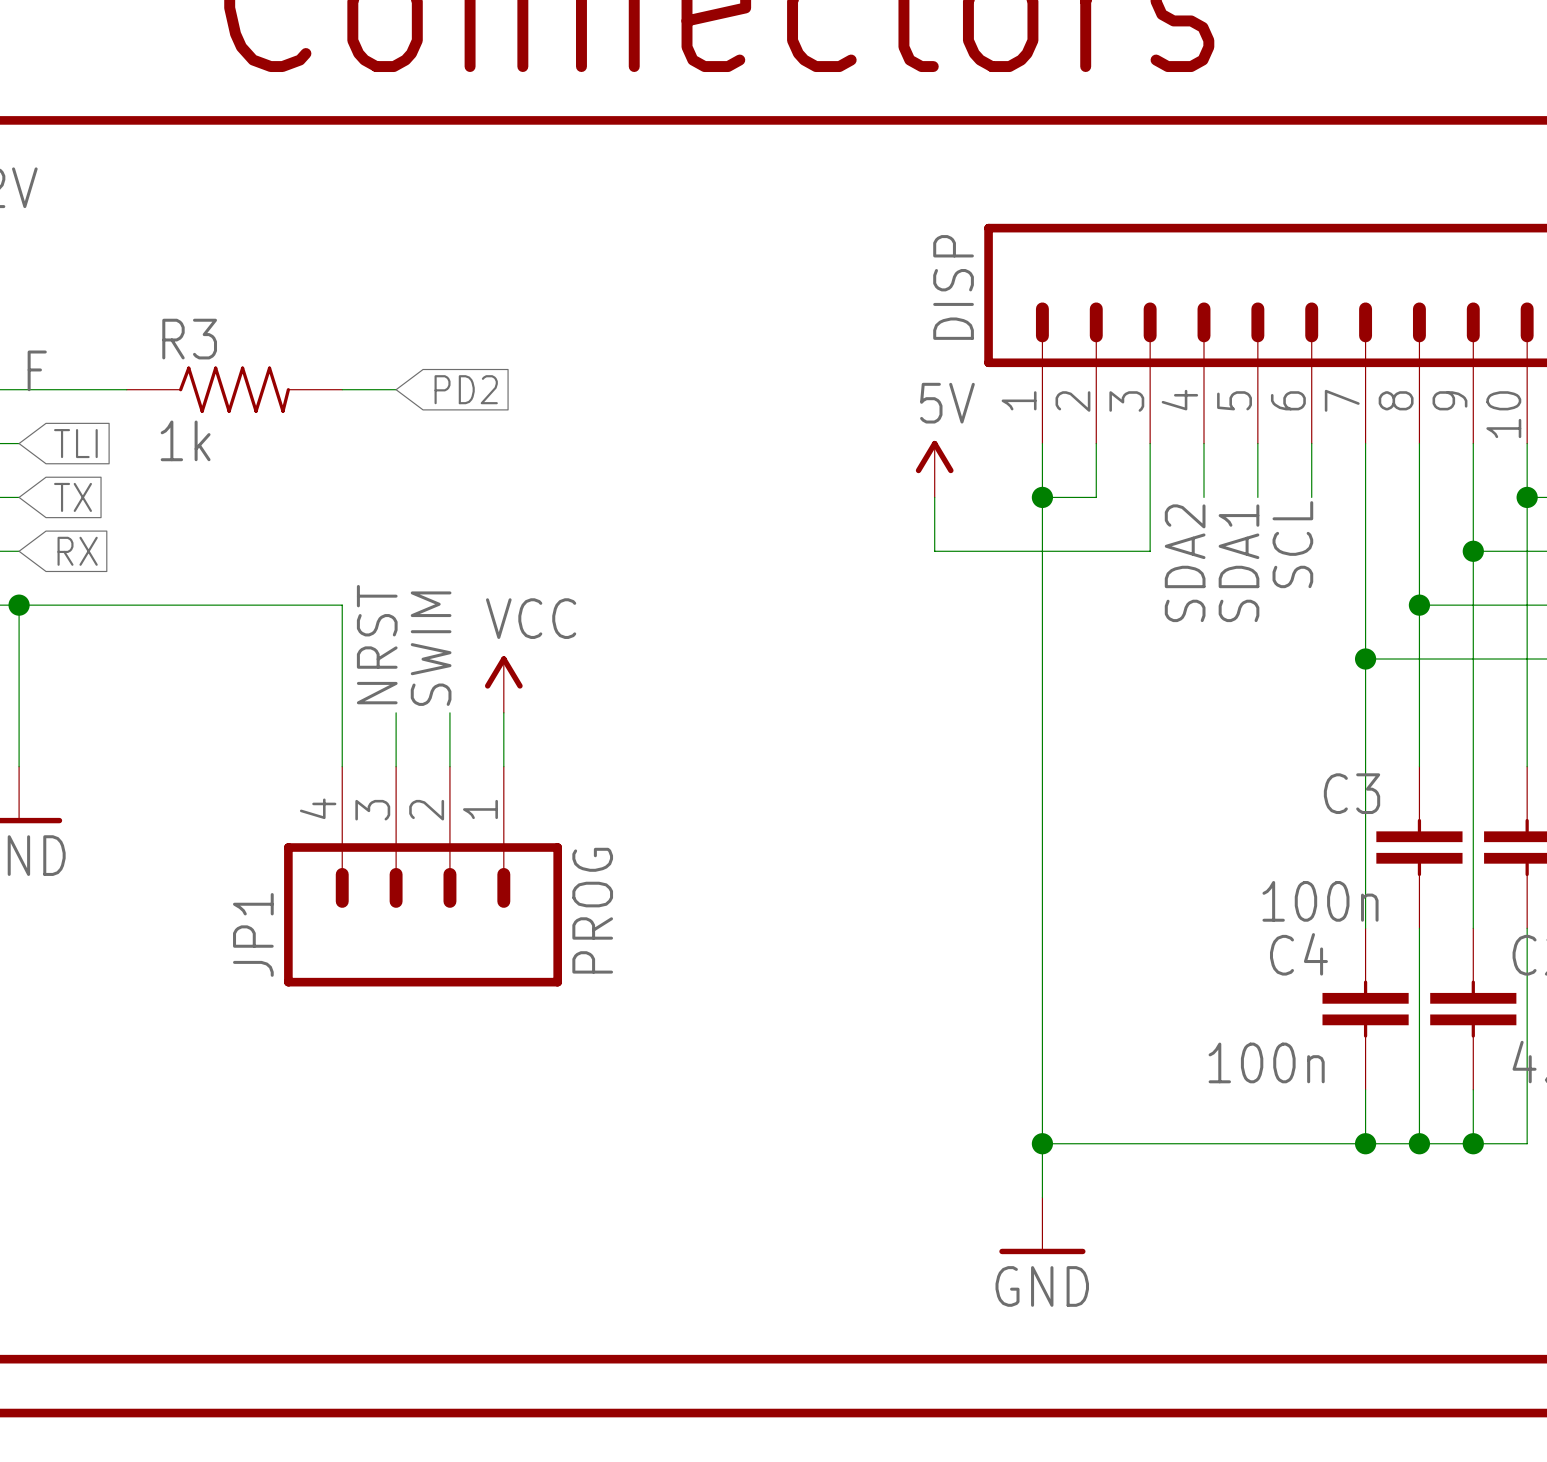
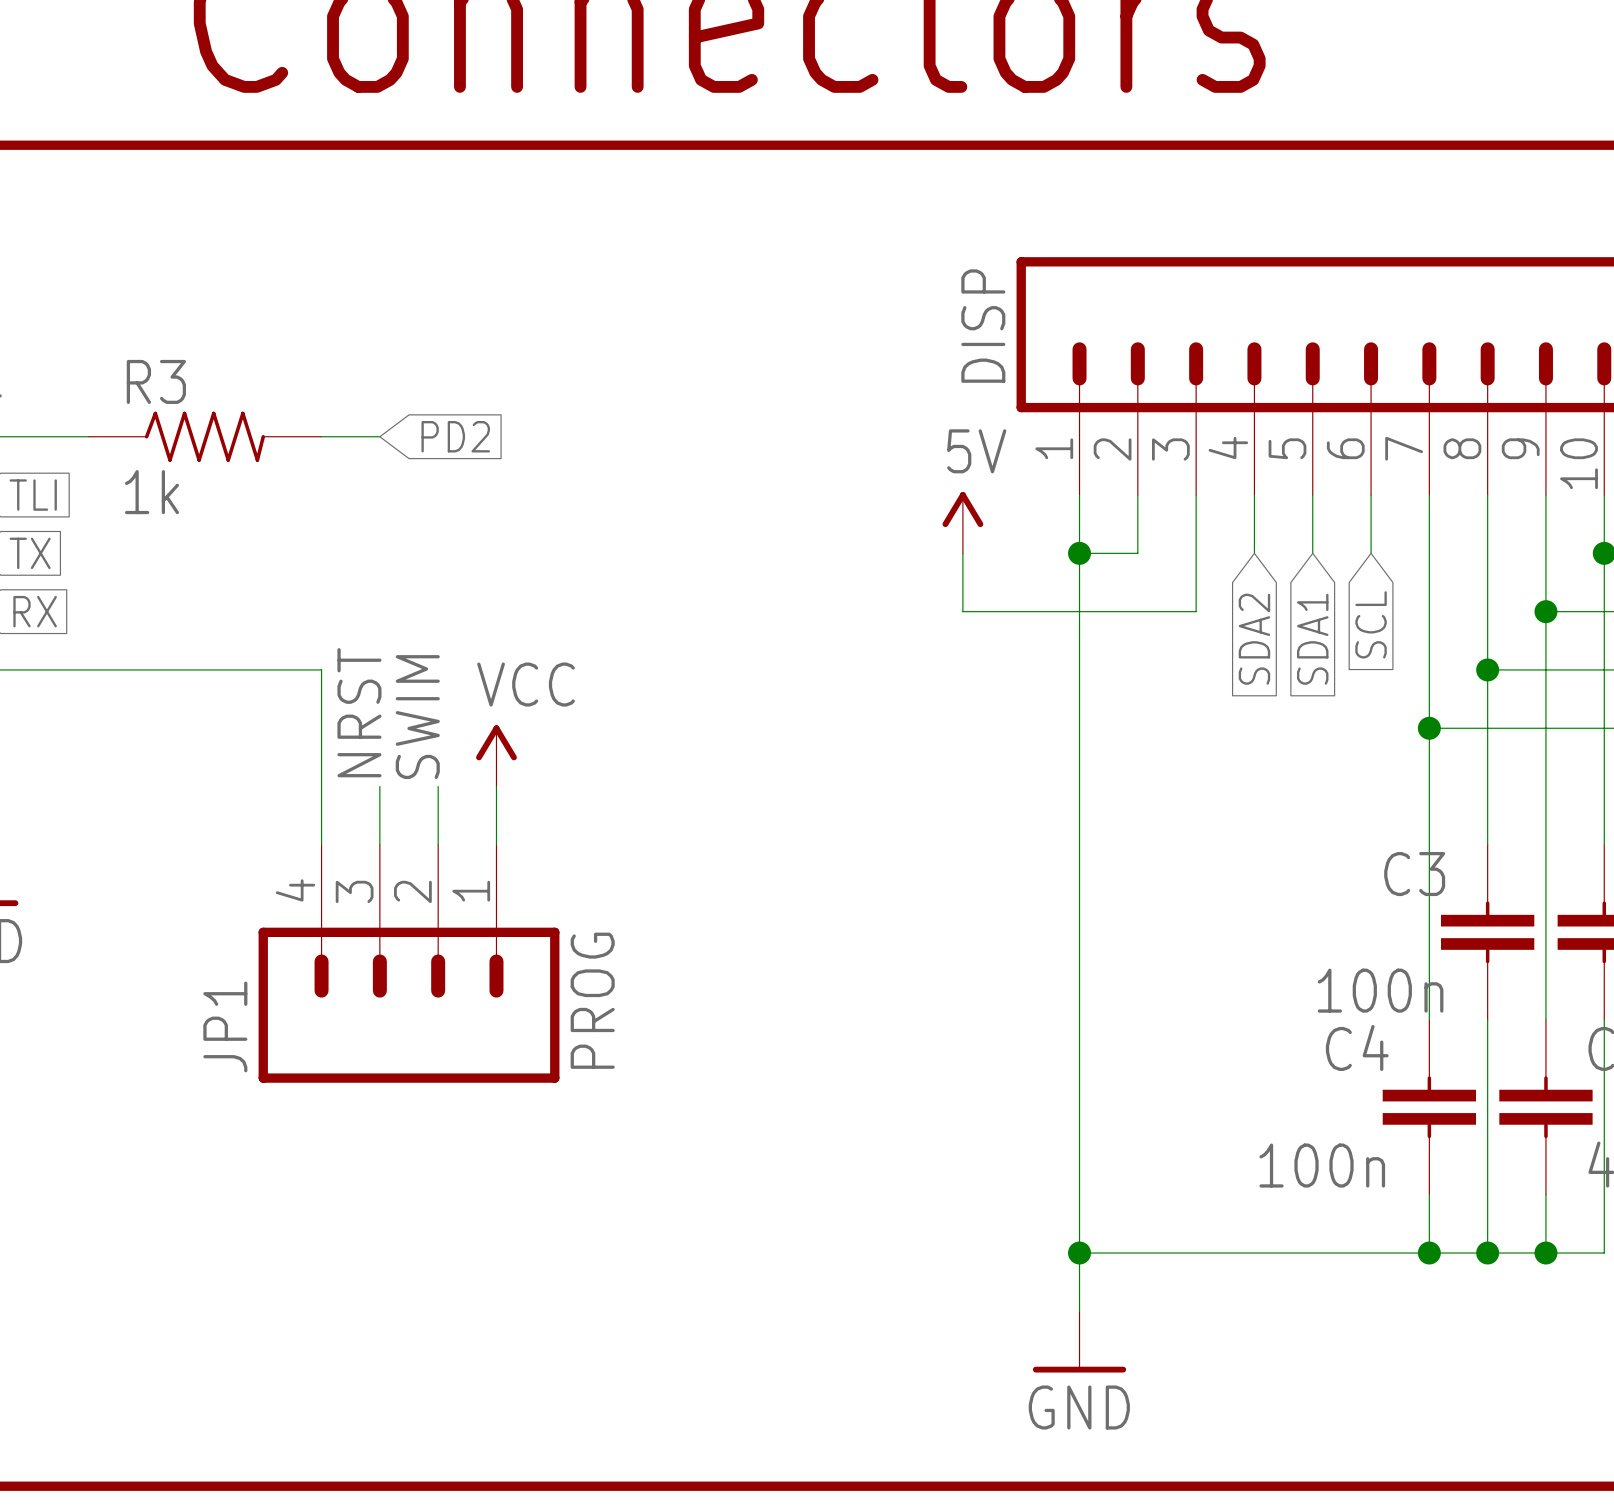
label: SCL (1292, 544) -> none
label: SDA2 (1185, 563) -> none
label: SDA1 (1239, 563) -> none
global label: none -> SCL (1371, 624)
global label: none -> SDA2 (1254, 639)
global label: none -> SDA1 (1312, 639)

